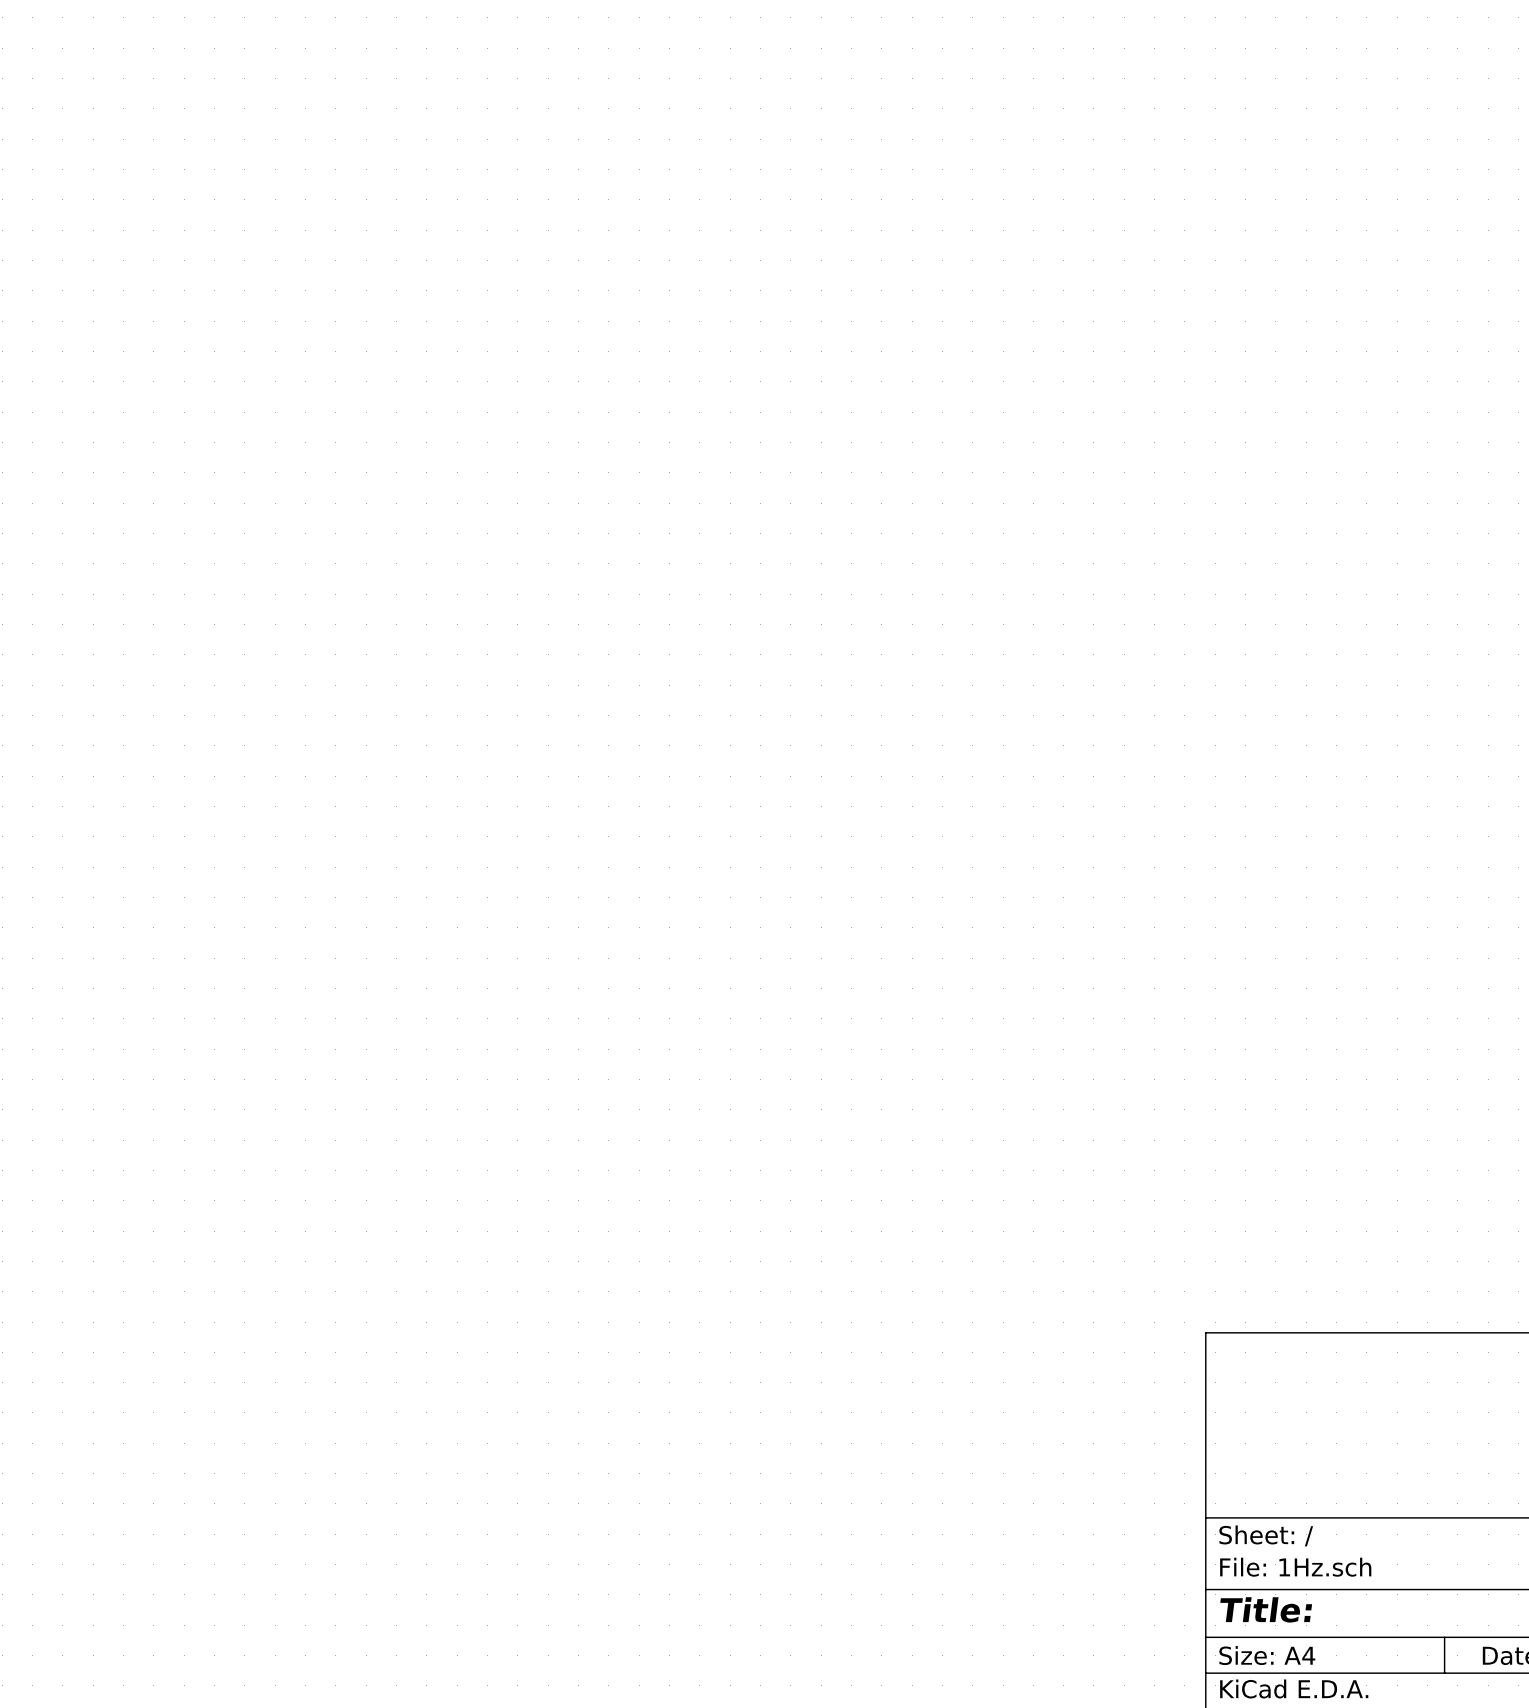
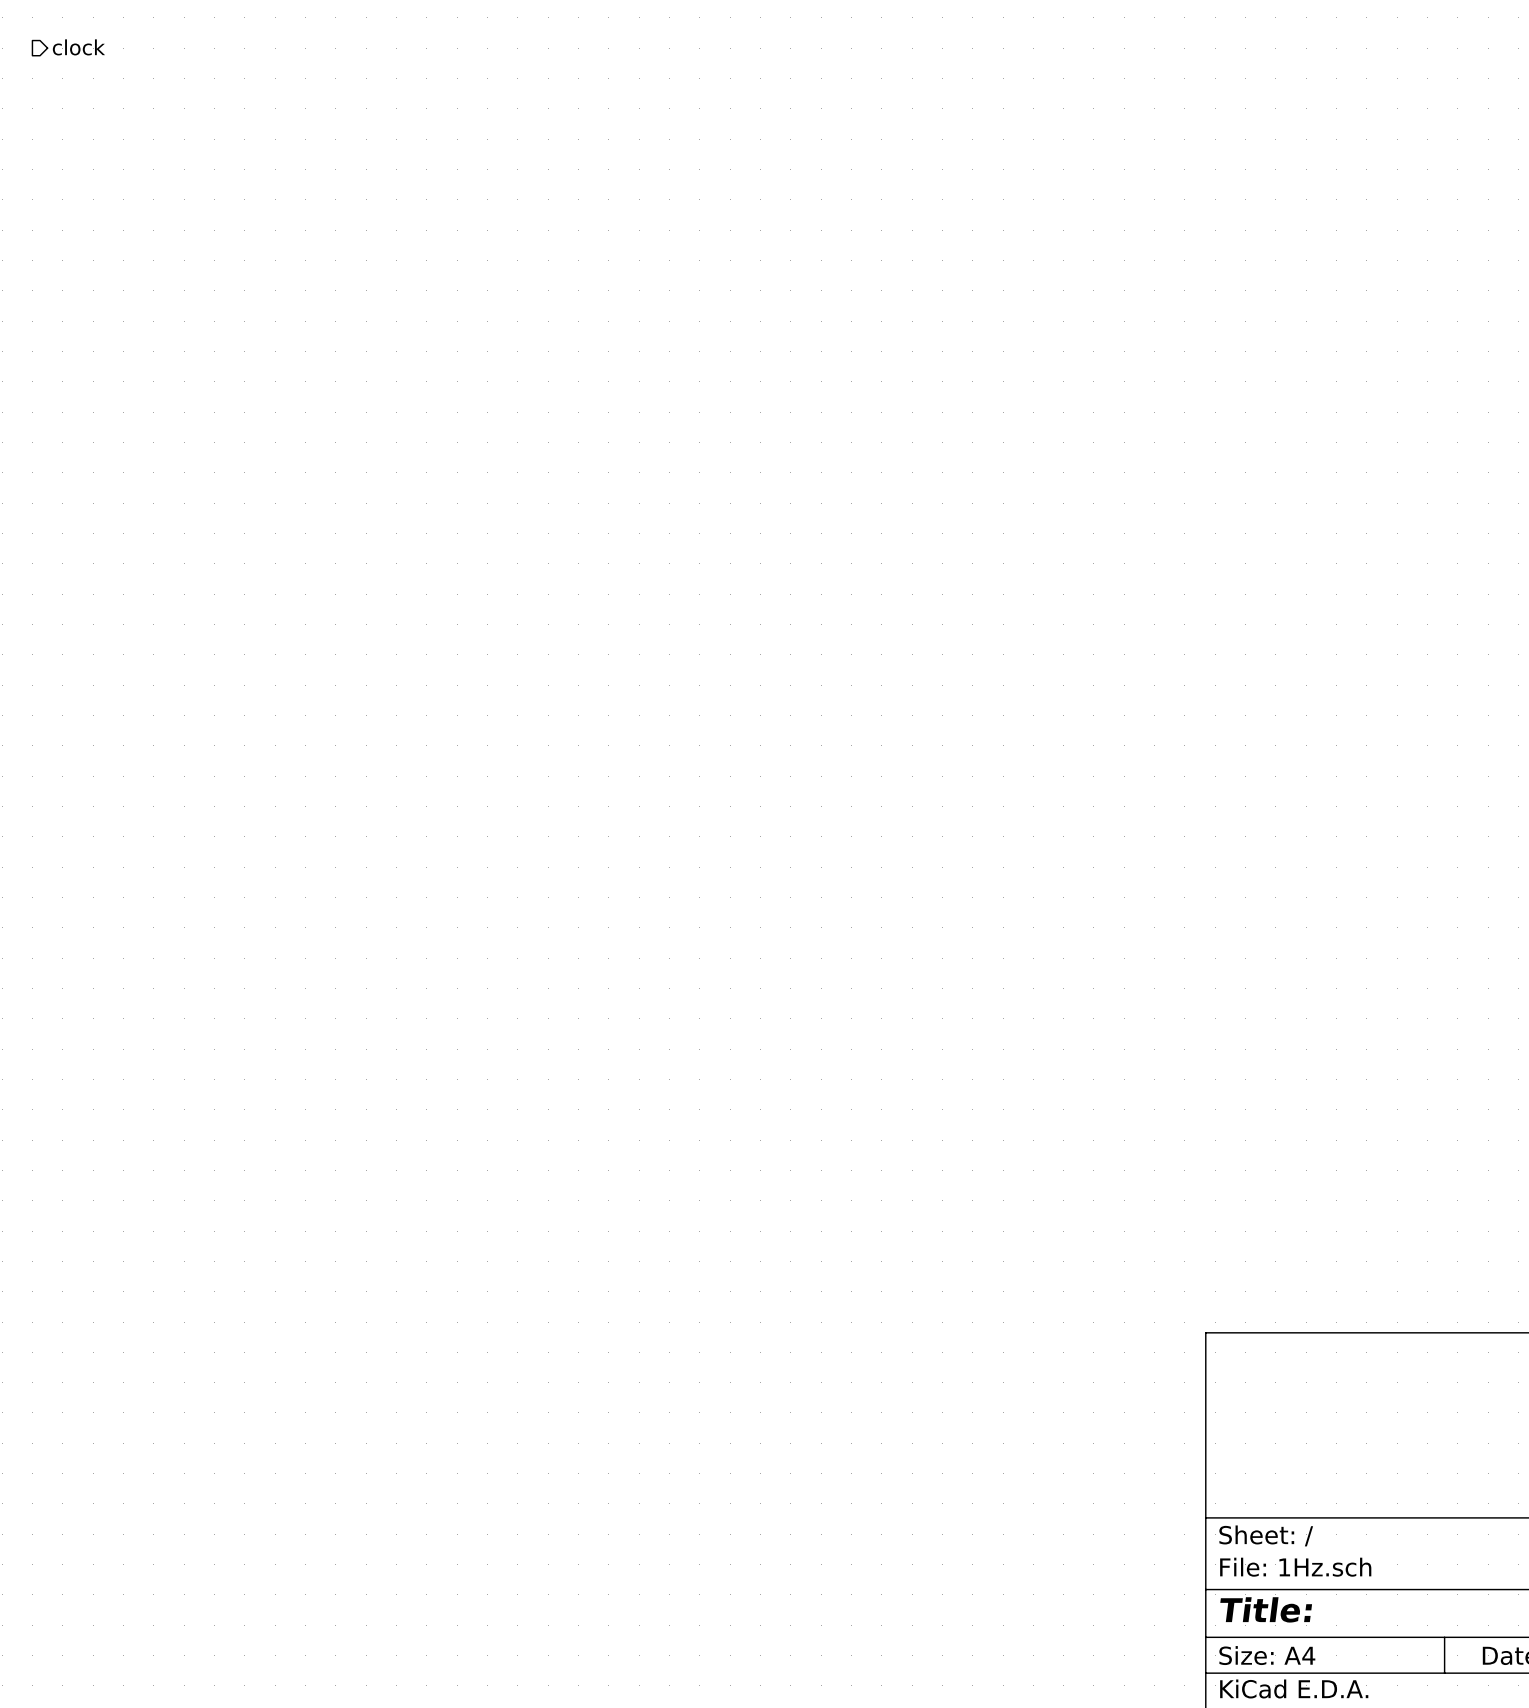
hierarchical label: none -> clock (78, 47)

